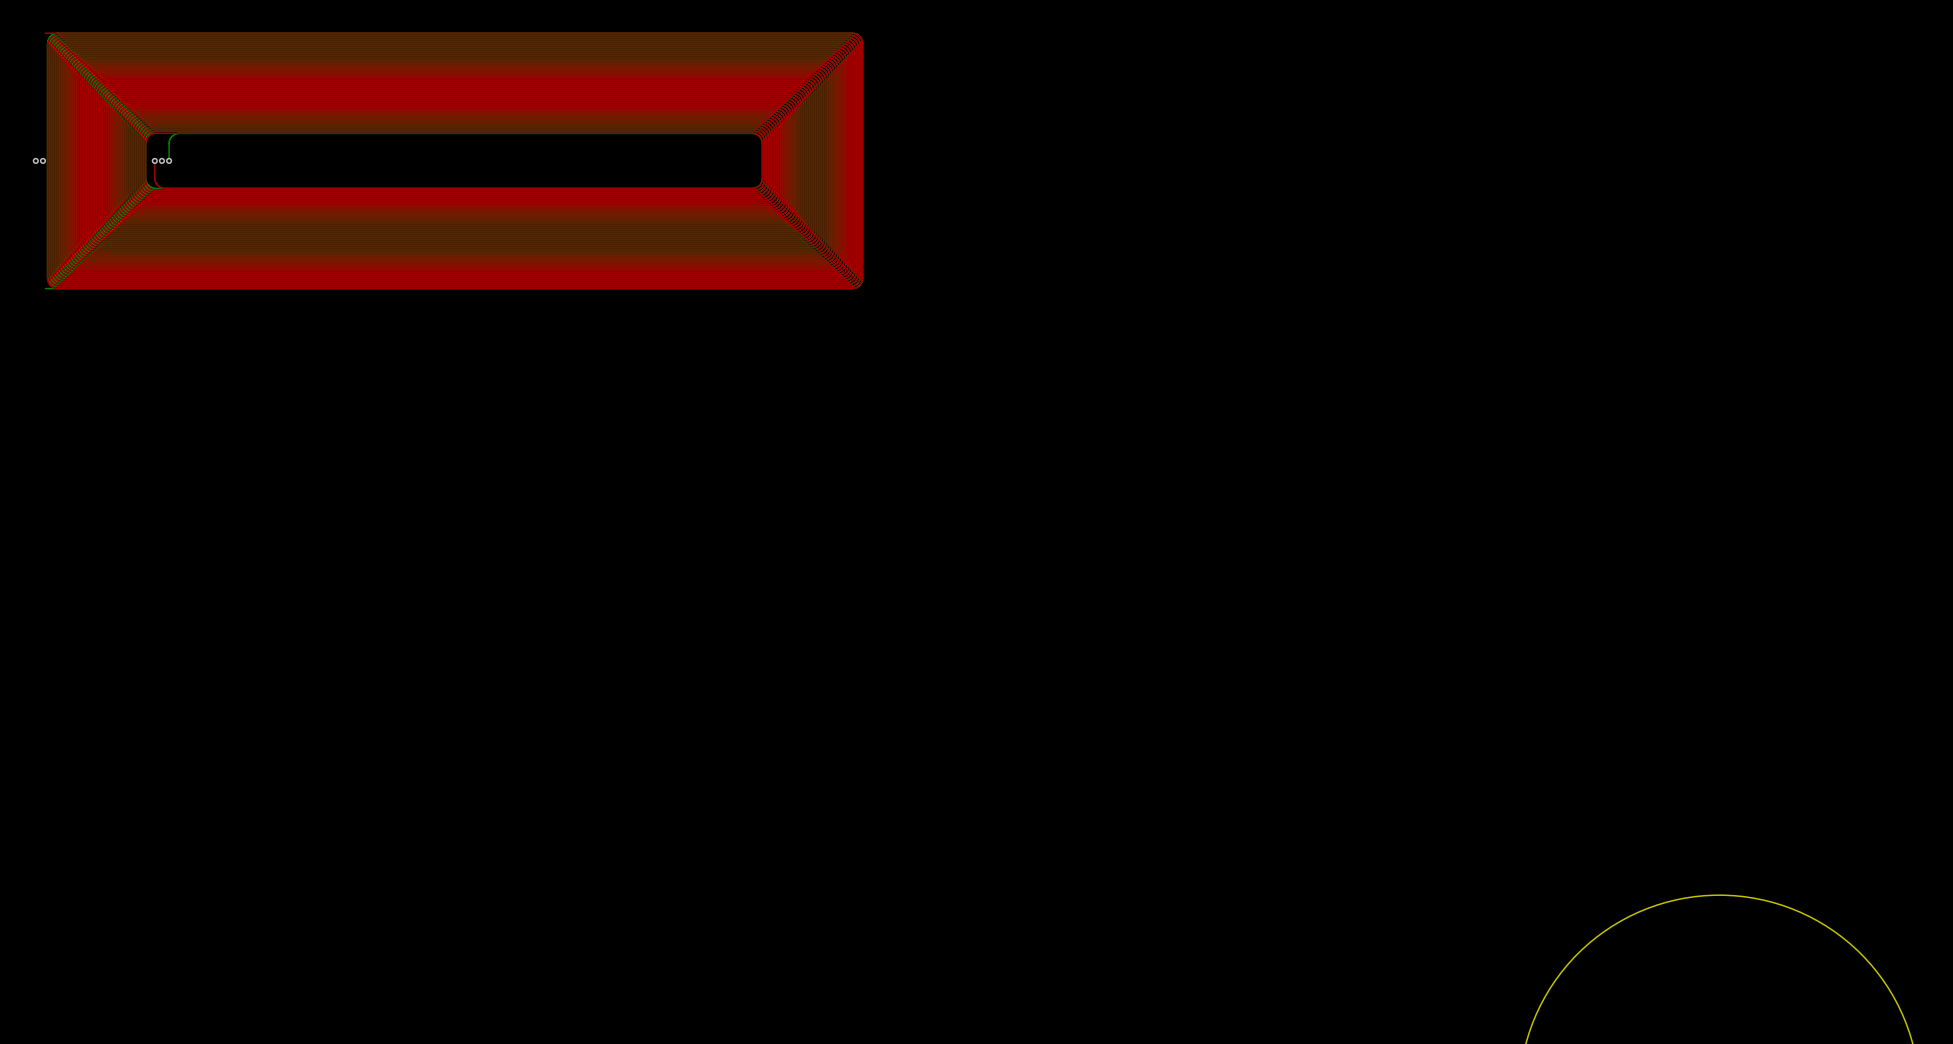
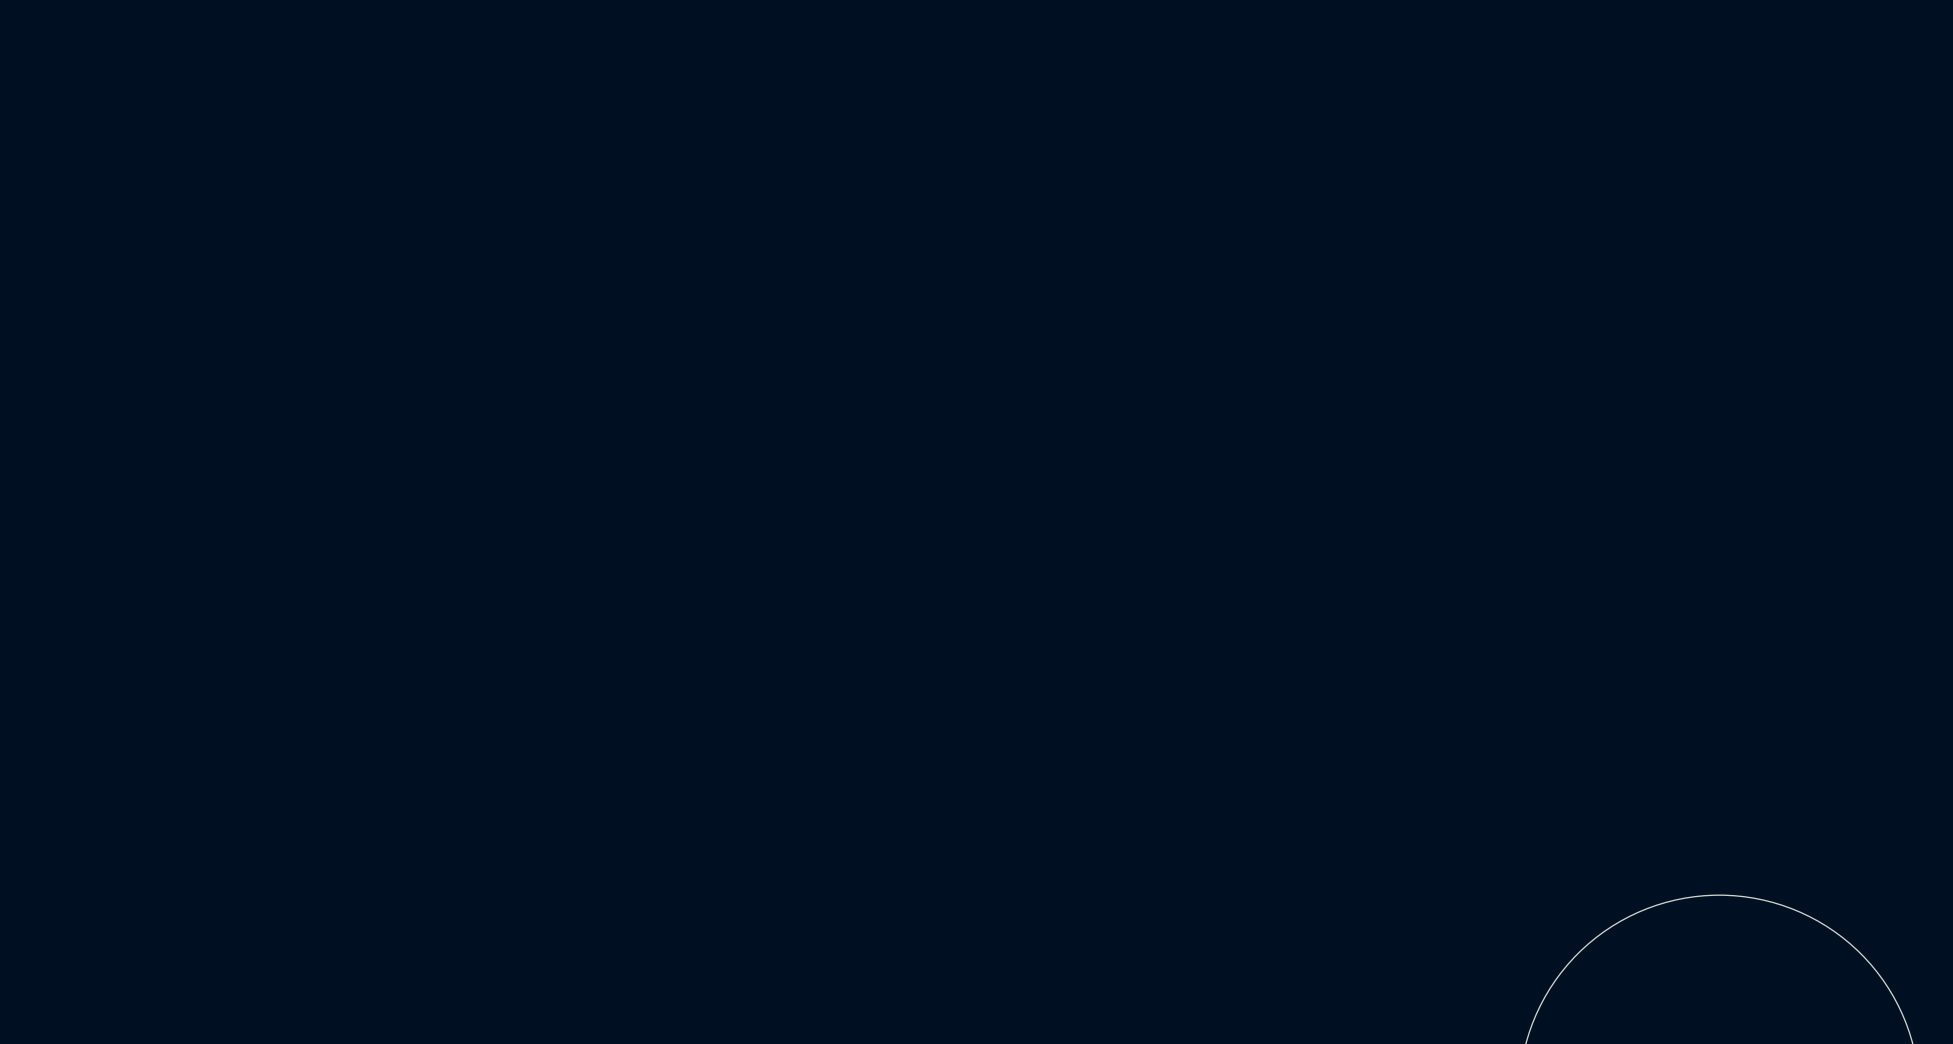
top track: (45, 33) (852, 33) (858, 35) (862, 41) (862, 278) (860, 284) (854, 288) (57, 288) (49, 284) (47, 278) (47, 45) (49, 39) (55, 35) (852, 35) (858, 39) (860, 45) (860, 276) (858, 282) (852, 286) (59, 286) (51, 282) (49, 276) (49, 47) (51, 41) (57, 37) (850, 37) (856, 41) (858, 47) (858, 274) (856, 280) (850, 284) (61, 284) (53, 280) (51, 274) (51, 49) (53, 43) (59, 39) (848, 39) (854, 43) (856, 49) (856, 272) (854, 278) (848, 282) (63, 282) (55, 278) (53, 272) (53, 51) (55, 45) (61, 41) (846, 41) (852, 45) (854, 51) (854, 270) (852, 276) (846, 280) (65, 280) (57, 276) (55, 270) (55, 53) (57, 47) (63, 43) (844, 43) (850, 47) (852, 53) (852, 268) (850, 274) (844, 278) (67, 278) (60, 274) (57, 268) (57, 55) (60, 49) (65, 45) (842, 45) (848, 49) (850, 55) (850, 266) (848, 272) (842, 276) (70, 276) (62, 272) (59, 266) (59, 57) (62, 51) (67, 47) (840, 47) (845, 51) (848, 57) (848, 264) (845, 270) (840, 274) (72, 274) (64, 270) (61, 264) (61, 59) (64, 53) (69, 49) (838, 49) (843, 53) (846, 59) (846, 262) (843, 268) (838, 271) (74, 272) (66, 268) (63, 262) (63, 61) (66, 55) (71, 51) (836, 51) (841, 55) (844, 61) (844, 259) (841, 266) (836, 269) (76, 270) (68, 266) (65, 259) (65, 63) (68, 57) (73, 53) (834, 53) (839, 57) (842, 63) (842, 257) (839, 264) (834, 267) (78, 268) (70, 264) (67, 257) (67, 65) (70, 59) (75, 55) (832, 55) (837, 59) (840, 65) (840, 255) (837, 262) (832, 265) (80, 266) (72, 262) (70, 255) (70, 67) (72, 61) (77, 58) (830, 58) (835, 61) (838, 67) (838, 253) (835, 260) (830, 263) (82, 264) (74, 260) (72, 253) (72, 70) (74, 63) (80, 60) (828, 60) (833, 63) (835, 70) (835, 251) (833, 258) (828, 261) (84, 262) (76, 258) (74, 251) (74, 72) (76, 65) (82, 62) (825, 62) (831, 65) (833, 72) (833, 249) (831, 256) (825, 259) (86, 259) (78, 256) (76, 249) (76, 74) (78, 67) (84, 64) (823, 64) (829, 67) (831, 74) (831, 247) (829, 254) (823, 257) (88, 257) (80, 254) (78, 247) (78, 76) (80, 69) (86, 66) (821, 66) (827, 69) (829, 76) (829, 245) (827, 252) (821, 255) (90, 255) (82, 252) (80, 245) (80, 78) (82, 71) (88, 68) (819, 68) (825, 71) (827, 78) (827, 243) (825, 250) (819, 253) (92, 253) (84, 250) (82, 243) (82, 80) (84, 73) (90, 70) (817, 70) (823, 73) (825, 80) (825, 241) (823, 247) (817, 251) (94, 251) (86, 247) (84, 241) (84, 82) (86, 75) (92, 72) (815, 72) (821, 75) (823, 82) (823, 239) (821, 245) (815, 249) (96, 249) (88, 245) (86, 239) (86, 84) (88, 77) (94, 74) (813, 74) (819, 77) (821, 84) (821, 237) (819, 243) (813, 247) (98, 247) (90, 243) (88, 237) (88, 86) (90, 79) (96, 76) (811, 76) (817, 79) (819, 86) (819, 235) (817, 241) (811, 245) (100, 245) (92, 241) (90, 235) (90, 88) (92, 82) (98, 78) (809, 78) (815, 82) (817, 88) (817, 233) (815, 239) (809, 243) (102, 243) (94, 239) (92, 233) (92, 90) (94, 84) (100, 80) (807, 80) (813, 84) (815, 90) (815, 231) (813, 237) (807, 241) (104, 241) (96, 237) (94, 231) (94, 92) (96, 86) (102, 82) (805, 82) (811, 86) (813, 92) (813, 229) (811, 235) (805, 239) (106, 239) (98, 235) (96, 229) (96, 94) (98, 88) (104, 84) (803, 84) (809, 88) (811, 94) (811, 227) (809, 233) (803, 237) (108, 237) (100, 233) (98, 227) (98, 96) (100, 90) (106, 86) (801, 86) (807, 90) (809, 96) (809, 225) (807, 231) (801, 235) (110, 235) (102, 231) (100, 225) (100, 98) (102, 92) (108, 88) (799, 88) (805, 92) (807, 98) (807, 223) (805, 229) (797, 233) (110, 233) (104, 229) (102, 223) (102, 100) (104, 94) (112, 90) (797, 90) (803, 94) (805, 100) (805, 221) (803, 227) (795, 231) (114, 231) (106, 227) (104, 221) (104, 102) (106, 96) (112, 92) (793, 92) (801, 96) (803, 102) (803, 219) (801, 225) (793, 229) (117, 229) (109, 225) (106, 219) (106, 104) (109, 98) (114, 94) (791, 94) (799, 98) (801, 104) (801, 217) (799, 223) (791, 227) (119, 227) (111, 223) (108, 217) (108, 106) (111, 100) (116, 96) (788, 96) (796, 100) (799, 106) (799, 215) (796, 221) (788, 225) (121, 225) (113, 221) (110, 215) (110, 108) (113, 102) (118, 98) (786, 98) (794, 102) (797, 108) (797, 213) (794, 219) (786, 223) (123, 223) (115, 219) (112, 213) (112, 110) (115, 104) (120, 100) (784, 100) (792, 104) (795, 110) (795, 210) (792, 217) (784, 221) (125, 221) (117, 217) (114, 210) (114, 112) (117, 106) (122, 102) (782, 102) (790, 106) (793, 112) (793, 208) (790, 215) (782, 219) (127, 219) (119, 215) (117, 208) (117, 114) (119, 108) (124, 105) (780, 104) (788, 108) (791, 114) (791, 206) (788, 213) (780, 217) (129, 217) (121, 213) (119, 206) (119, 117) (121, 110) (126, 107) (778, 106) (786, 110) (788, 117) (788, 204) (786, 211) (778, 215) (131, 215) (123, 211) (121, 204) (121, 119) (123, 112) (129, 109) (776, 108) (784, 112) (786, 119) (786, 202) (784, 209) (776, 213) (133, 213) (126, 210) (123, 202) (123, 121) (125, 114) (131, 111) (774, 110) (782, 114) (784, 121) (784, 203) (781, 208) (774, 210) (135, 210) (127, 207) (125, 200) (125, 123) (127, 116) (133, 113) (772, 112) (779, 115) (782, 123) (782, 200) (779, 206) (772, 208) (137, 208) (129, 205) (127, 198) (127, 125) (129, 118) (135, 115) (770, 114) (776, 117) (780, 122) (780, 196) (778, 203) (770, 206) (139, 206) (131, 203) (129, 196) (129, 127) (131, 120) (137, 117) (768, 117) (774, 119) (778, 127) (778, 196) (774, 202) (768, 204) (141, 204) (133, 200) (131, 194) (131, 129) (133, 122) (139, 119) (766, 119) (772, 121) (776, 126) (776, 192) (774, 198) (766, 202) (143, 202) (135, 198) (133, 192) (133, 131) (135, 124) (141, 121) (764, 121) (770, 123) (774, 131) (774, 192) (770, 198) (764, 200) (145, 200) (137, 196) (135, 190) (135, 131) (139, 125) (145, 123) (762, 123) (768, 125) (772, 133) (772, 190) (768, 196) (762, 198) (147, 198) (141, 196) (137, 188) (137, 133) (141, 127) (147, 125) (760, 125) (766, 127) (770, 135) (770, 188) (766, 194) (760, 196) (149, 196) (143, 194) (139, 186) (139, 135) (143, 129) (149, 127) (758, 127) (764, 129) (768, 137) (768, 186) (764, 192) (758, 194) (151, 194) (145, 192) (141, 184) (141, 137) (145, 131) (151, 129) (756, 129) (762, 131) (766, 139) (766, 184) (762, 190) (756, 192) (153, 192) (147, 190) (143, 182) (143, 139) (147, 133) (153, 131) (754, 131) (760, 133) (764, 141) (764, 182) (760, 188) (754, 190) (155, 190) (149, 188) (145, 180) (145, 141) (149, 135) (155, 133) (752, 133) (758, 135) (762, 143) (762, 180) (758, 186) (752, 188) (165, 188) (158, 186) (155, 182) (154, 160) -> none
via: (35, 160) -> none
via: (42, 160) -> none
via: (154, 160) -> none
via: (161, 160) -> none
via: (169, 160) -> none

